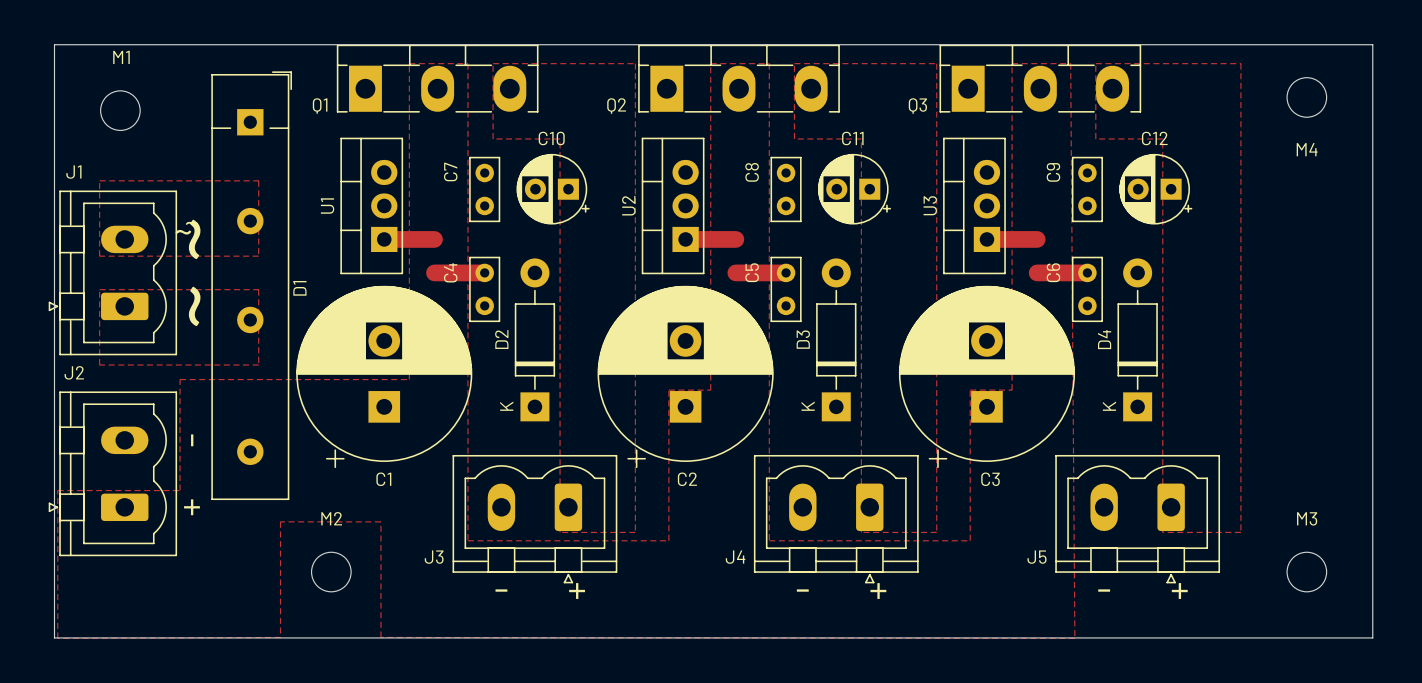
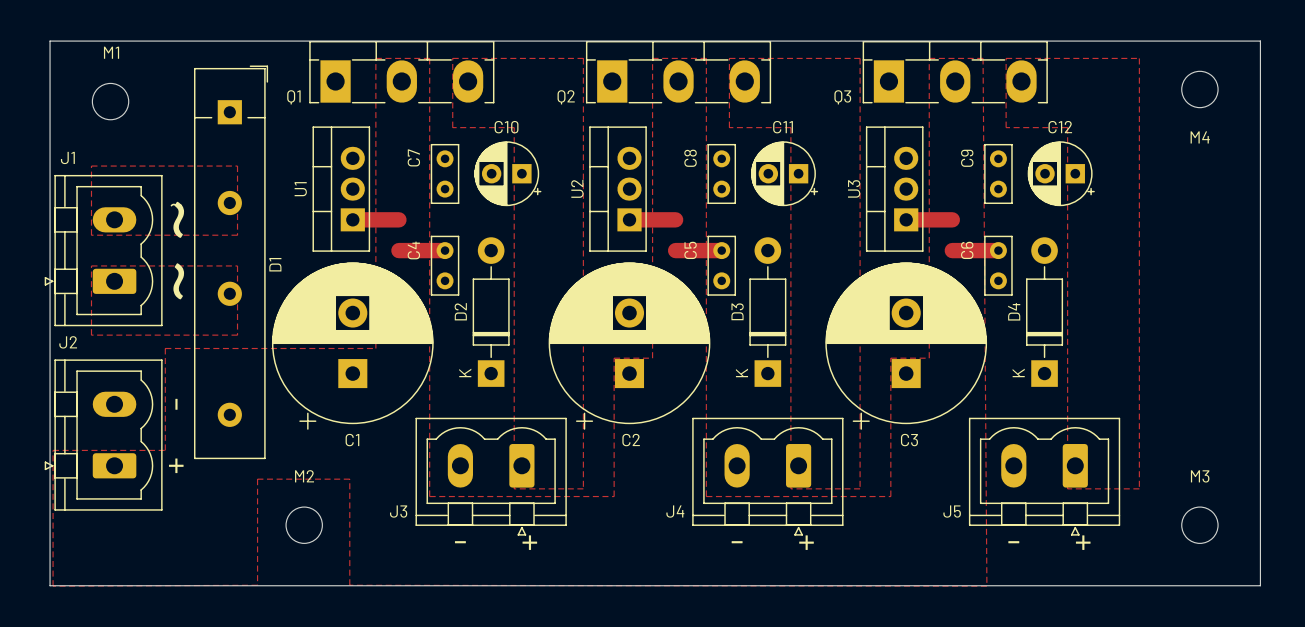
text: ~ (183, 232) -> none

